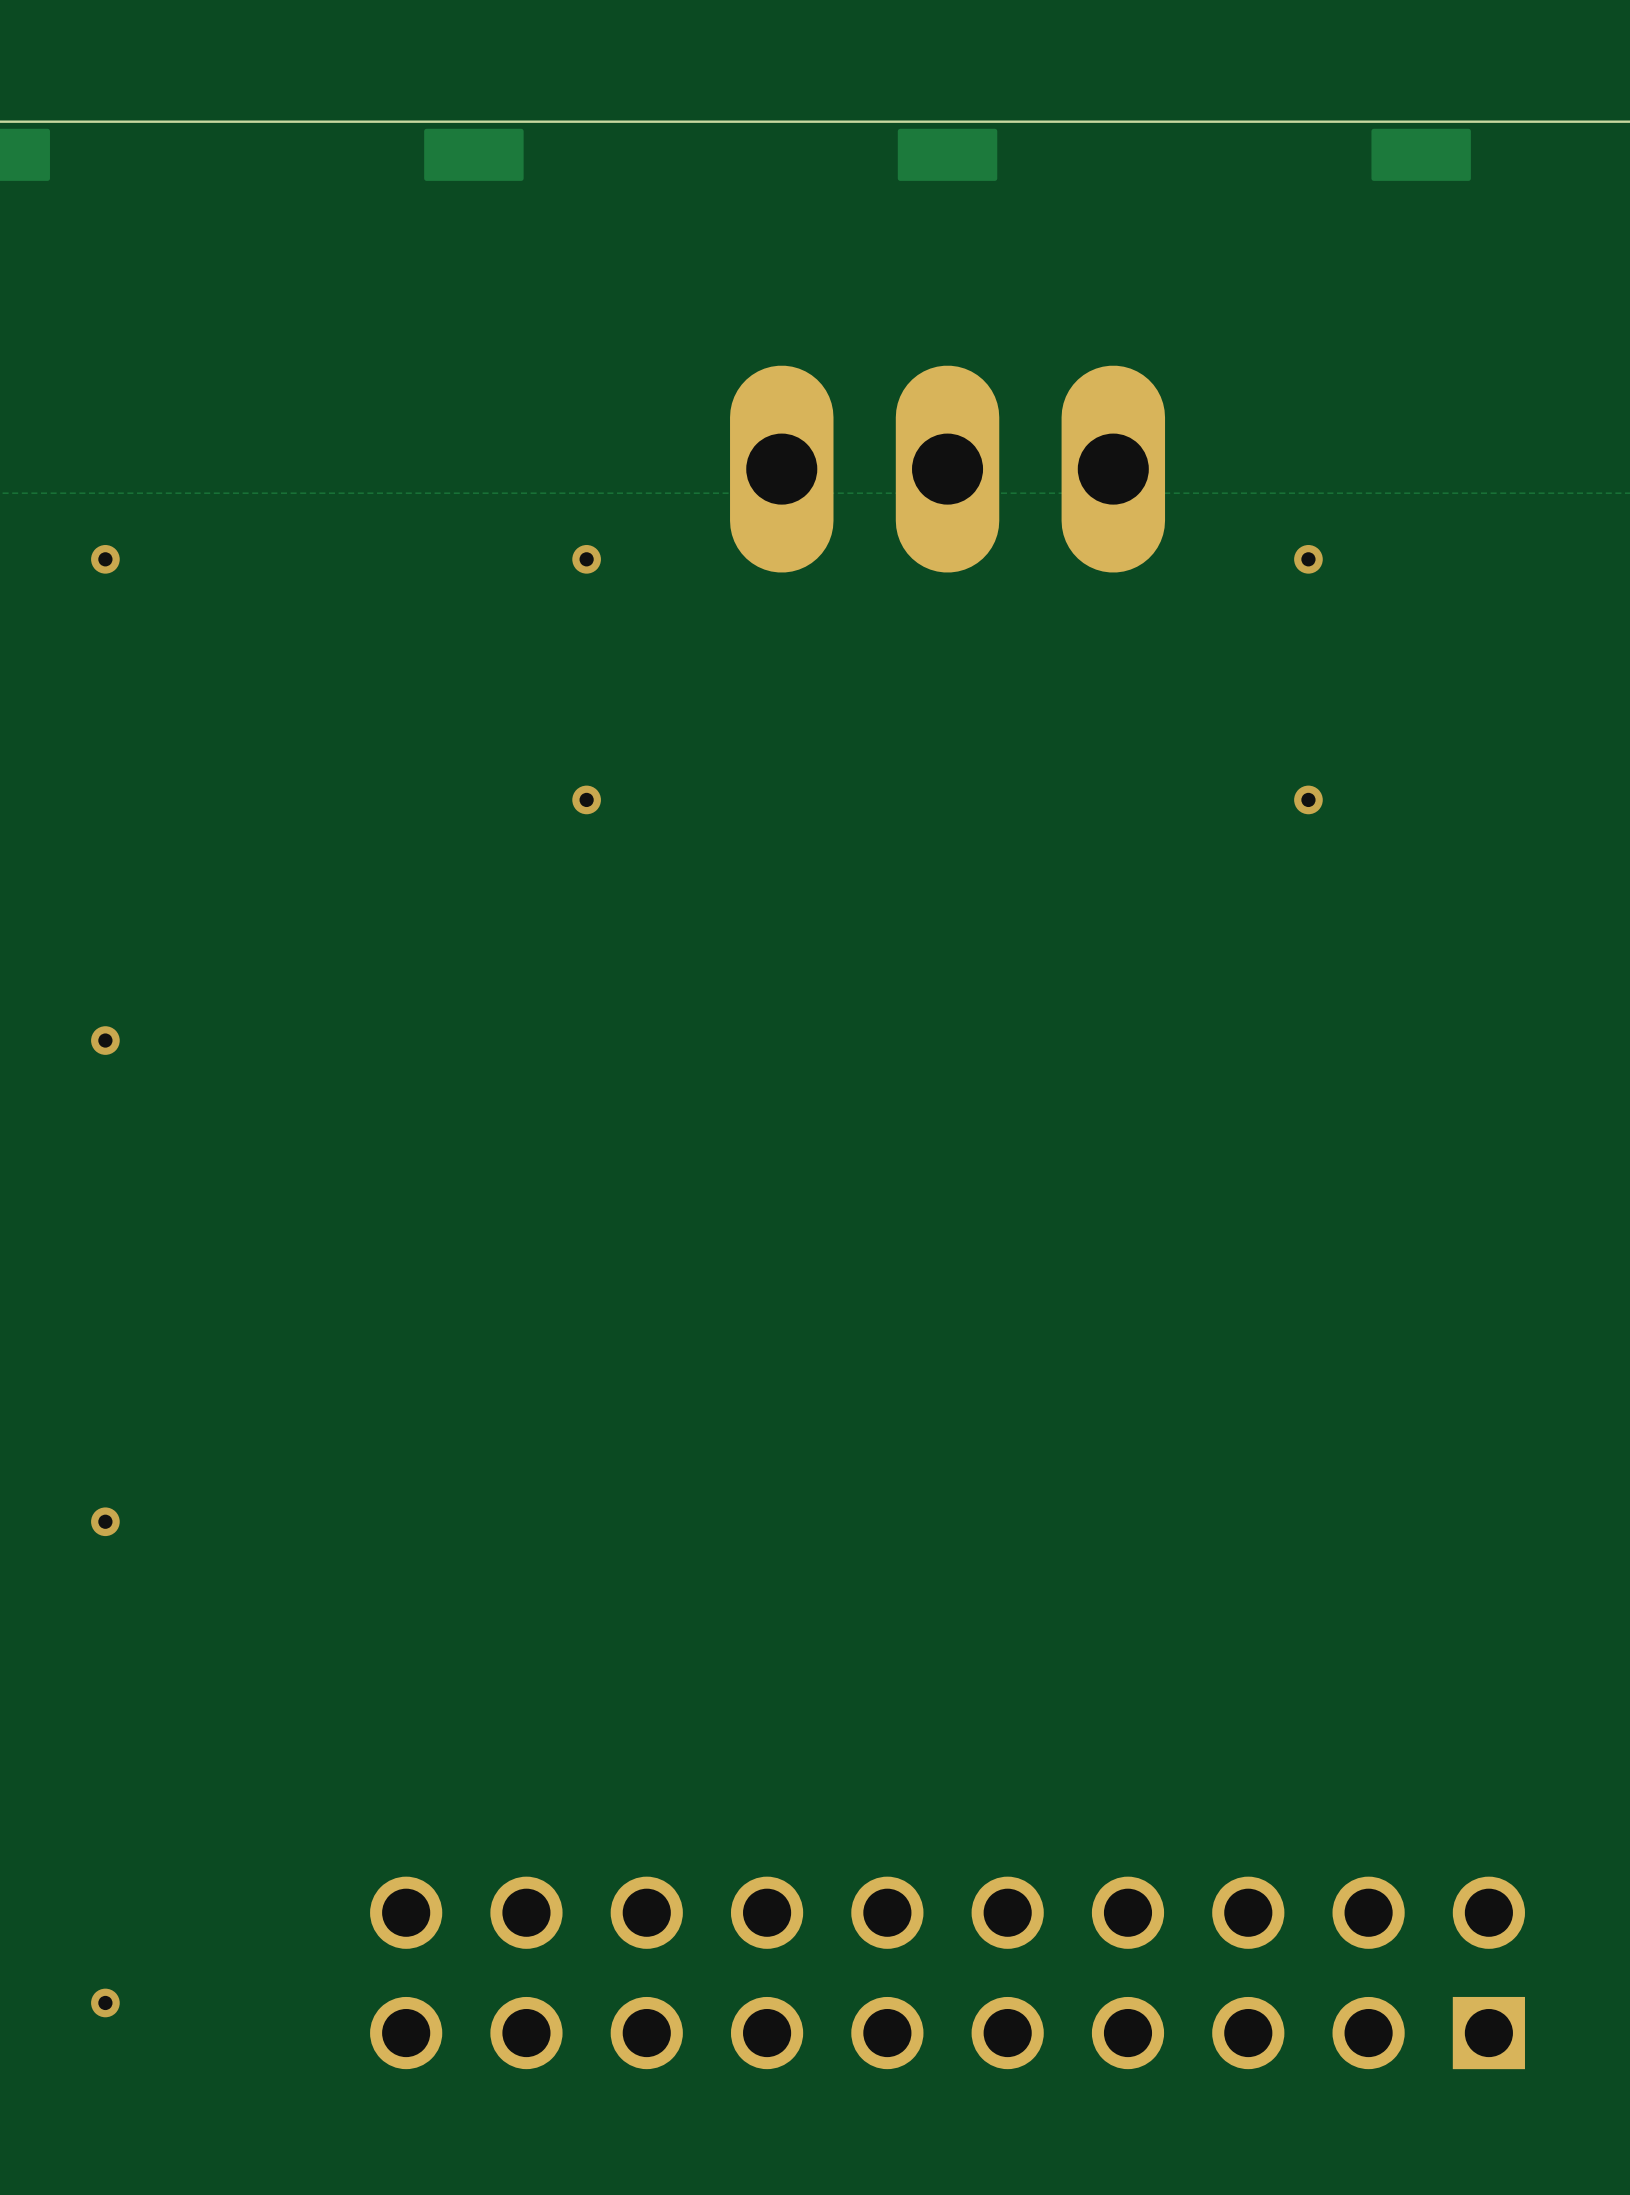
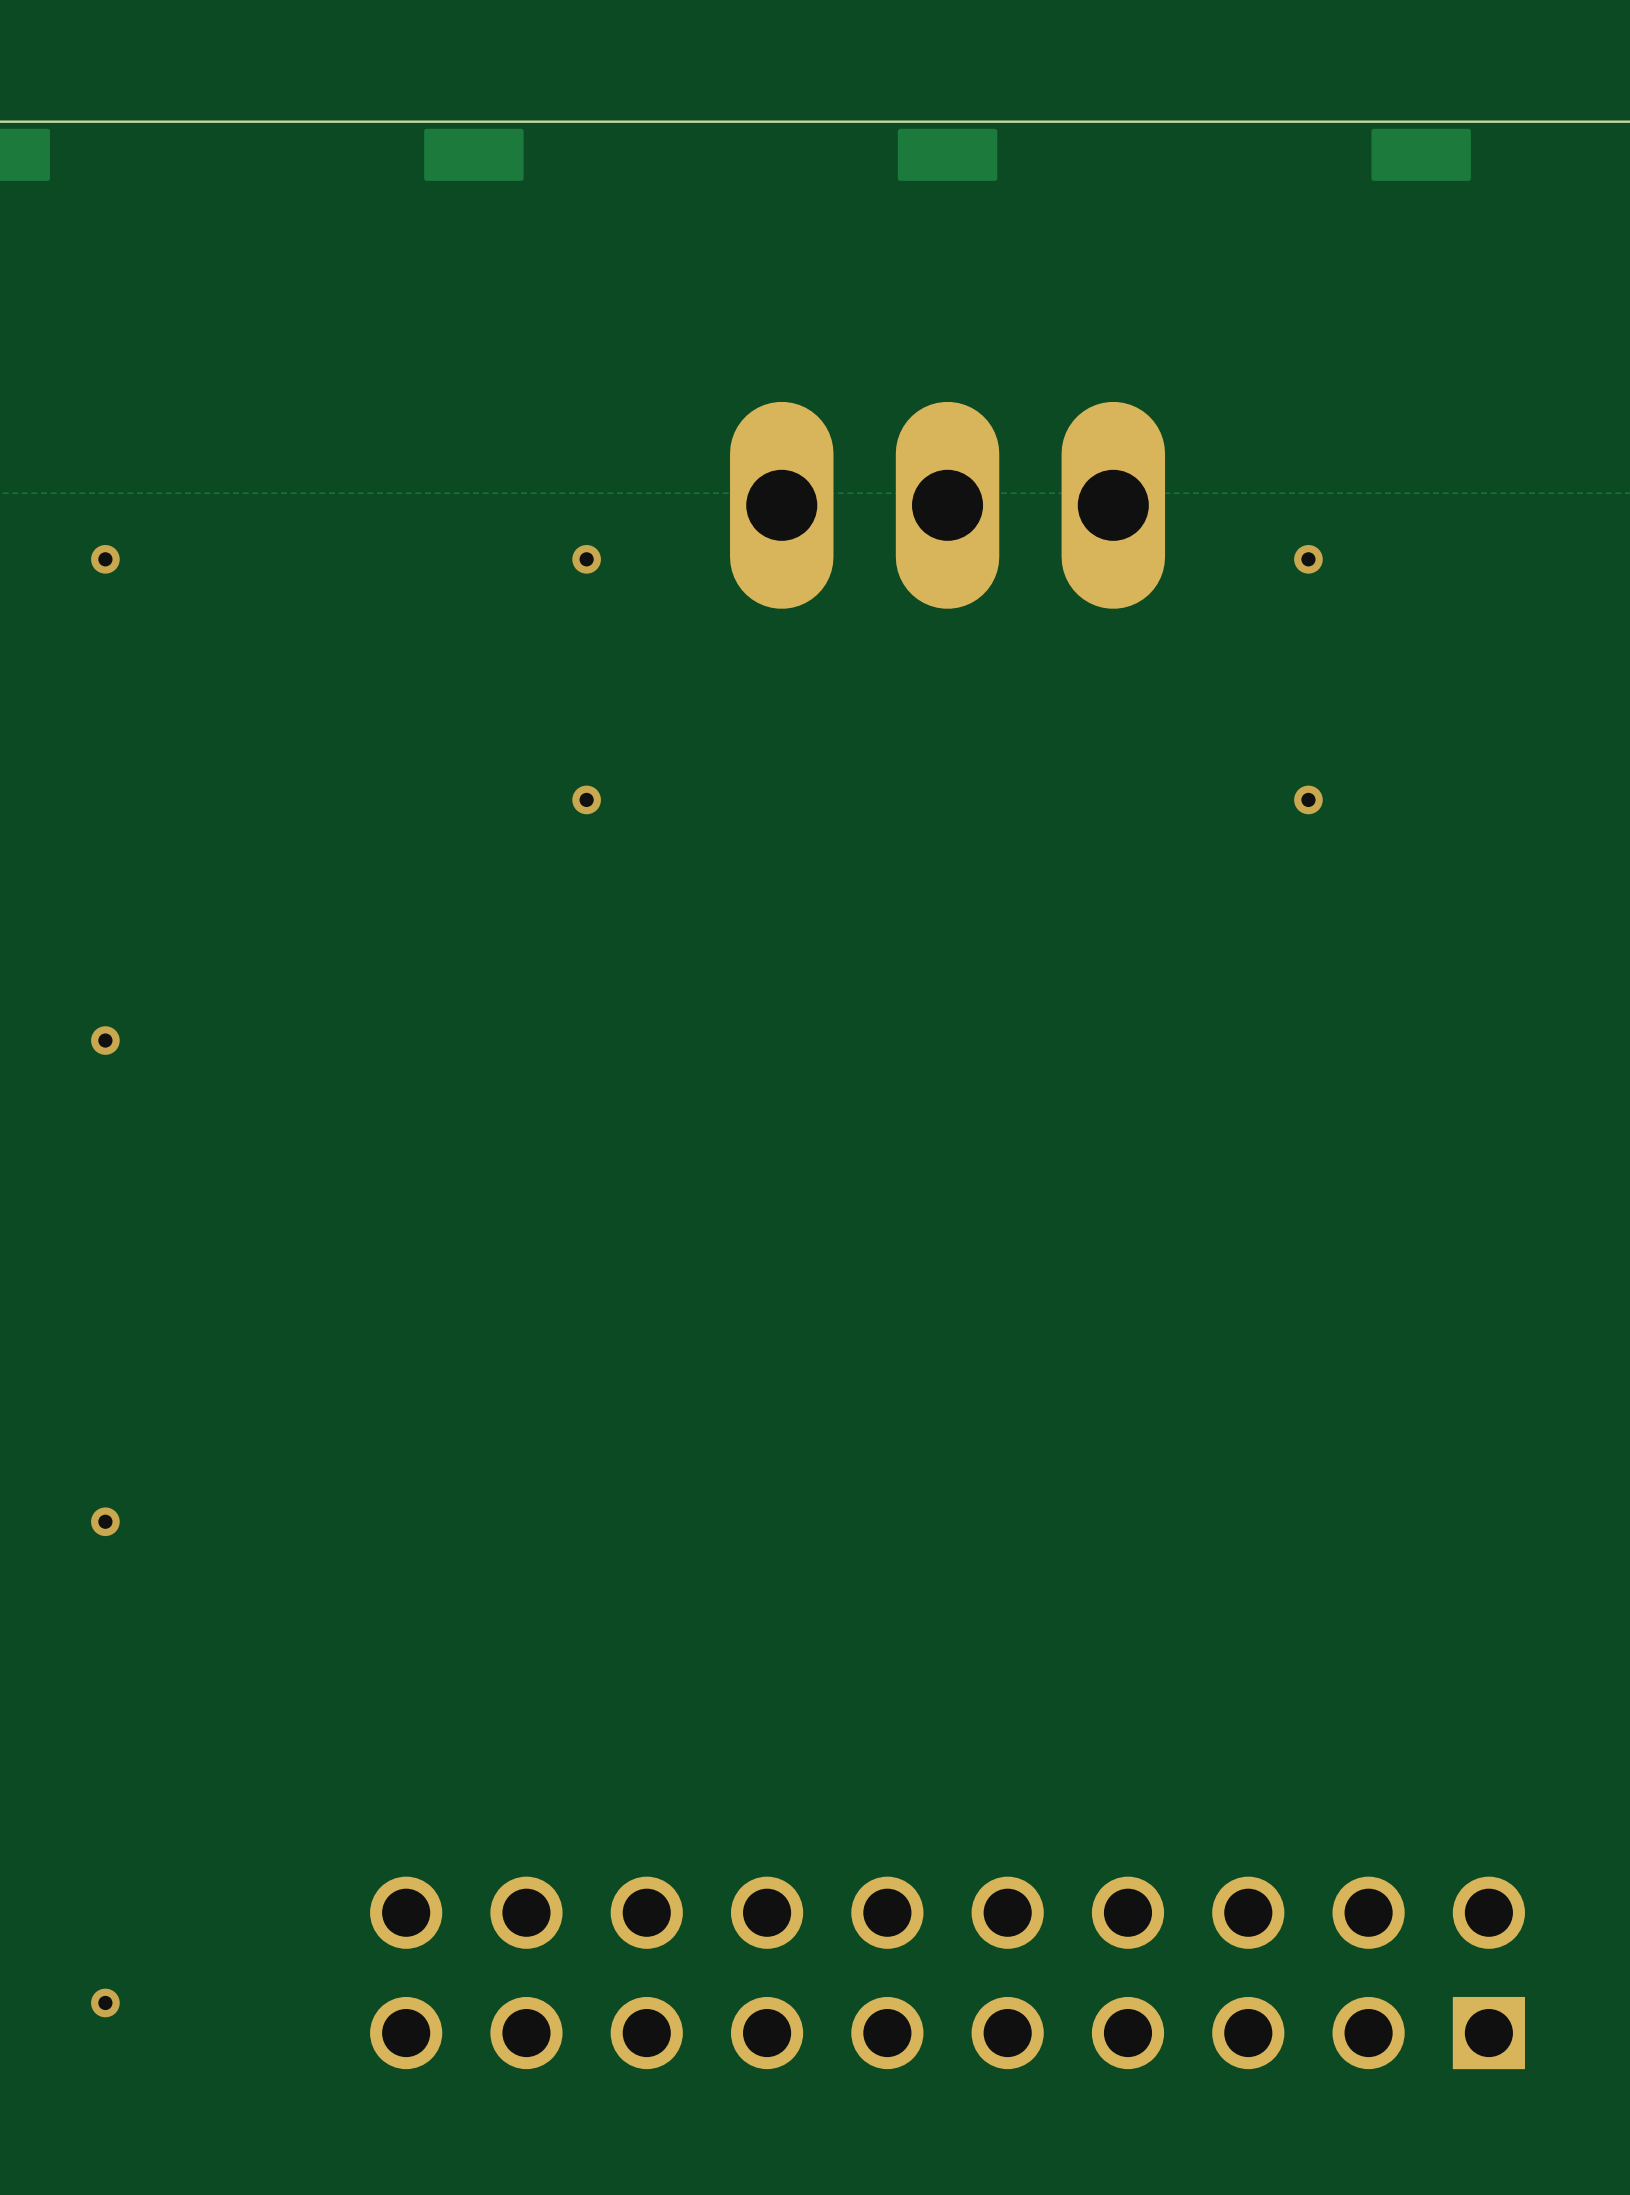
part position: (947, 469) -> (947, 505)

